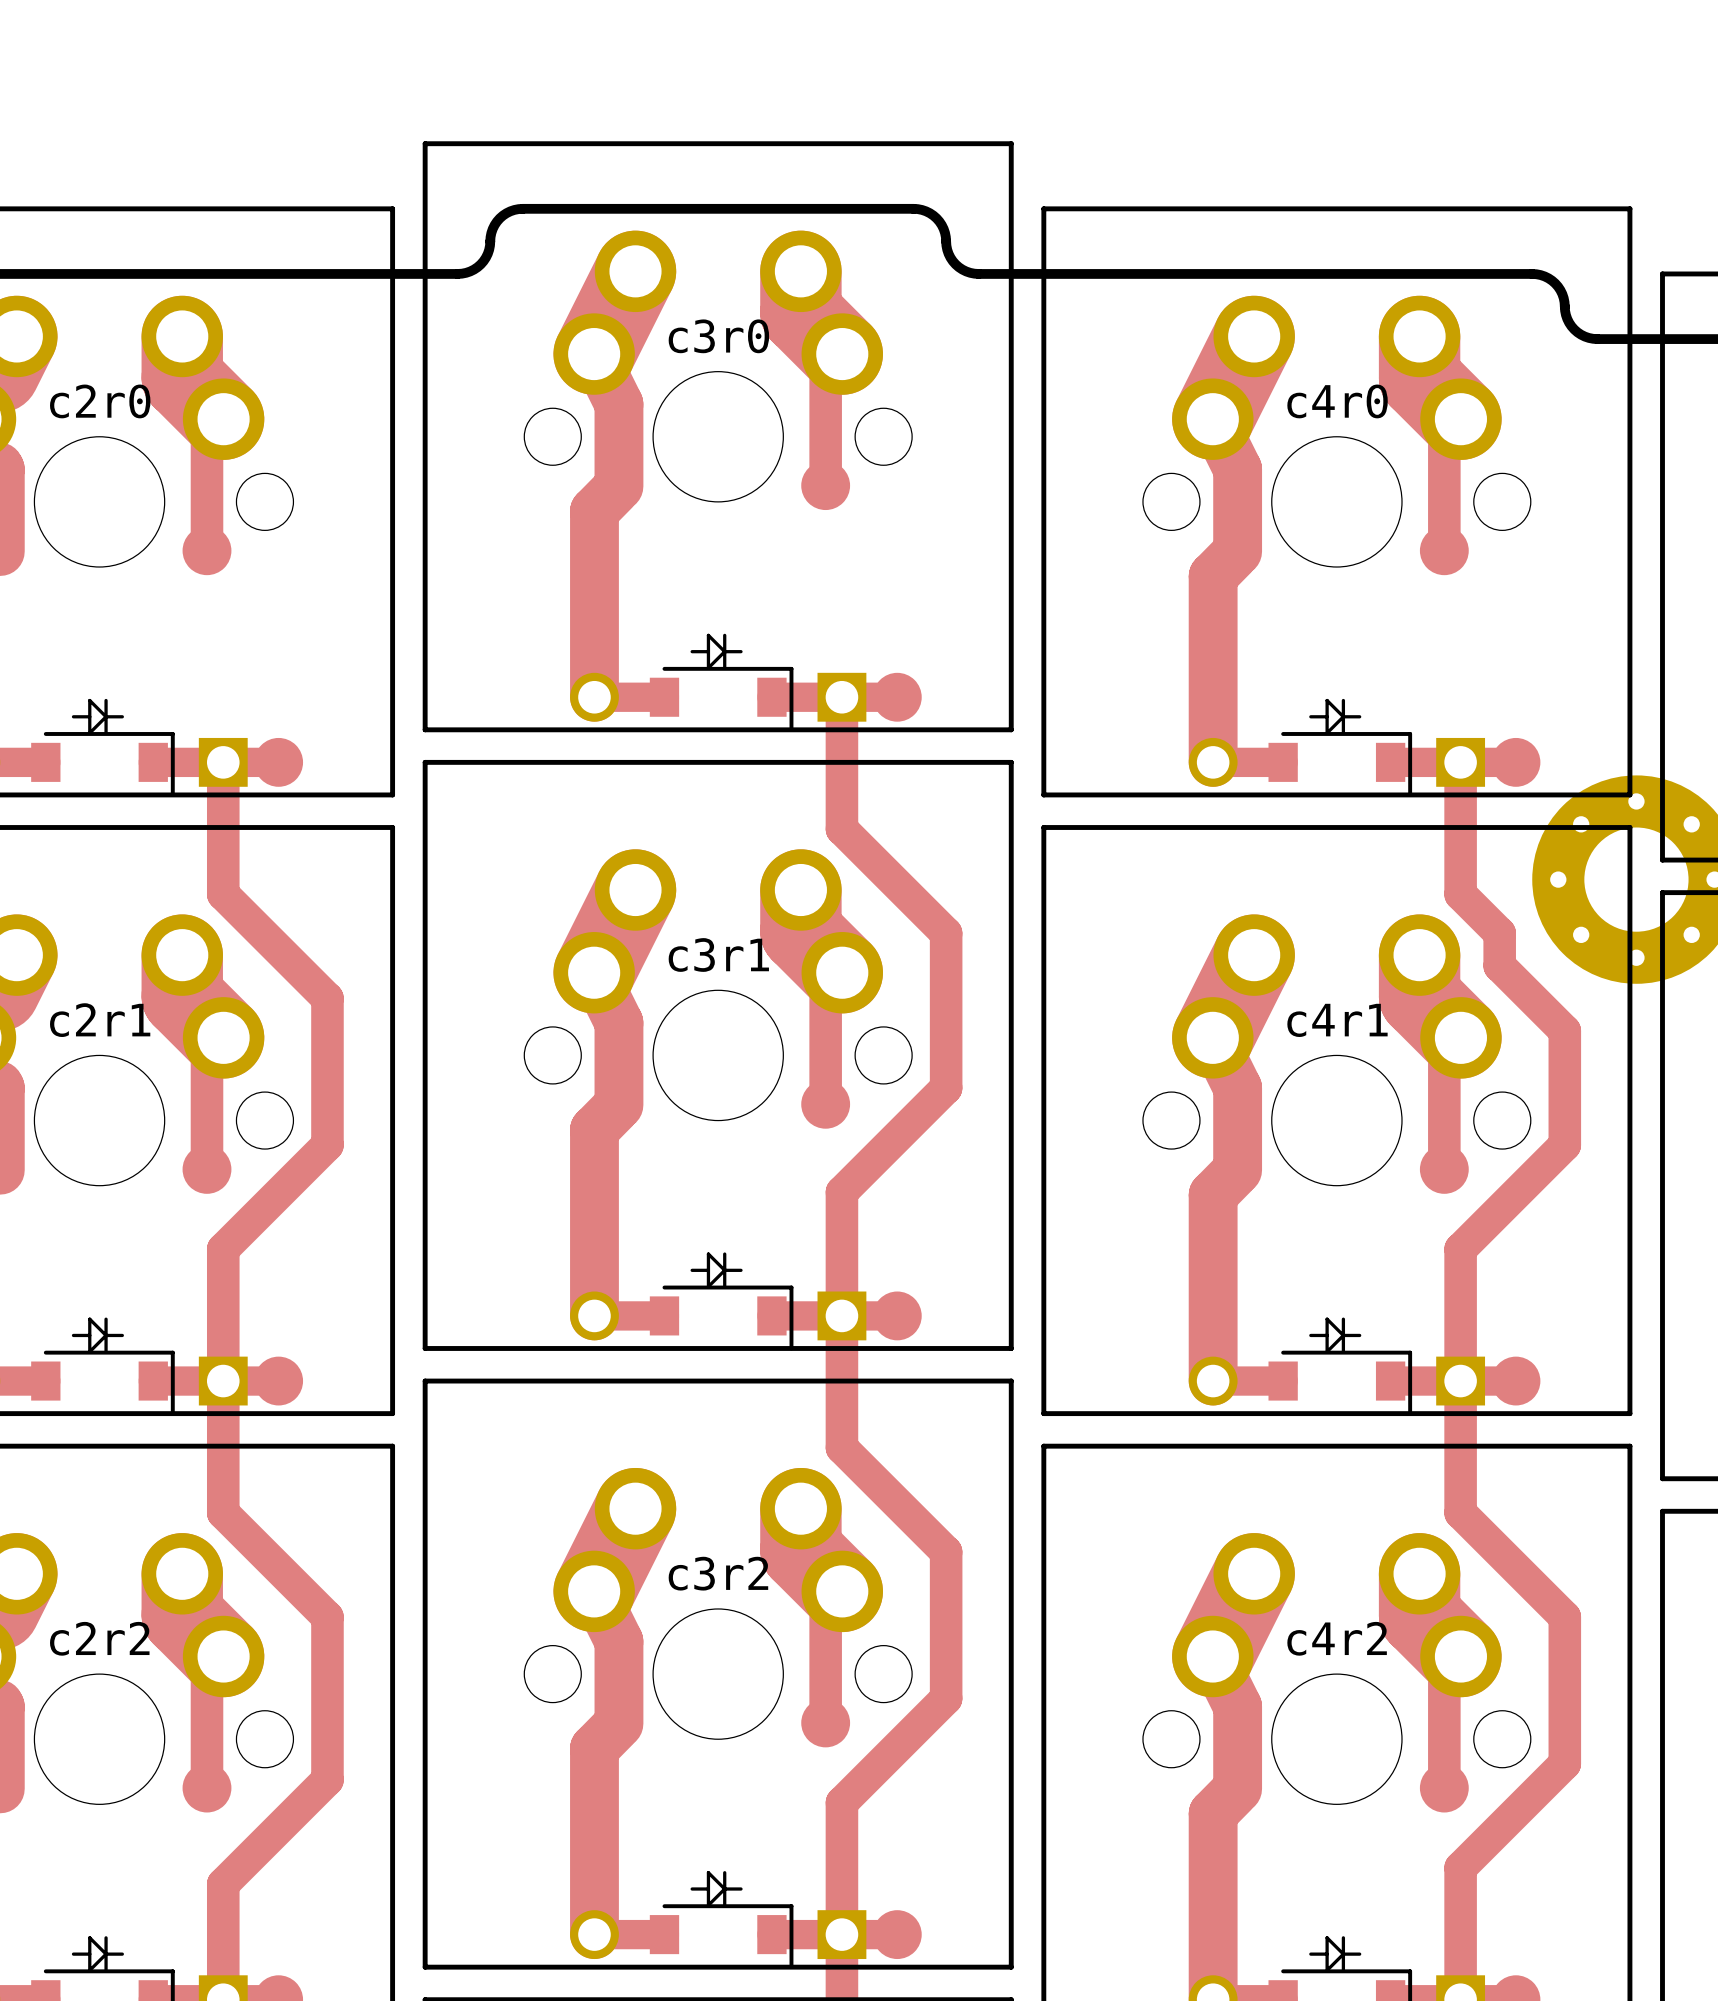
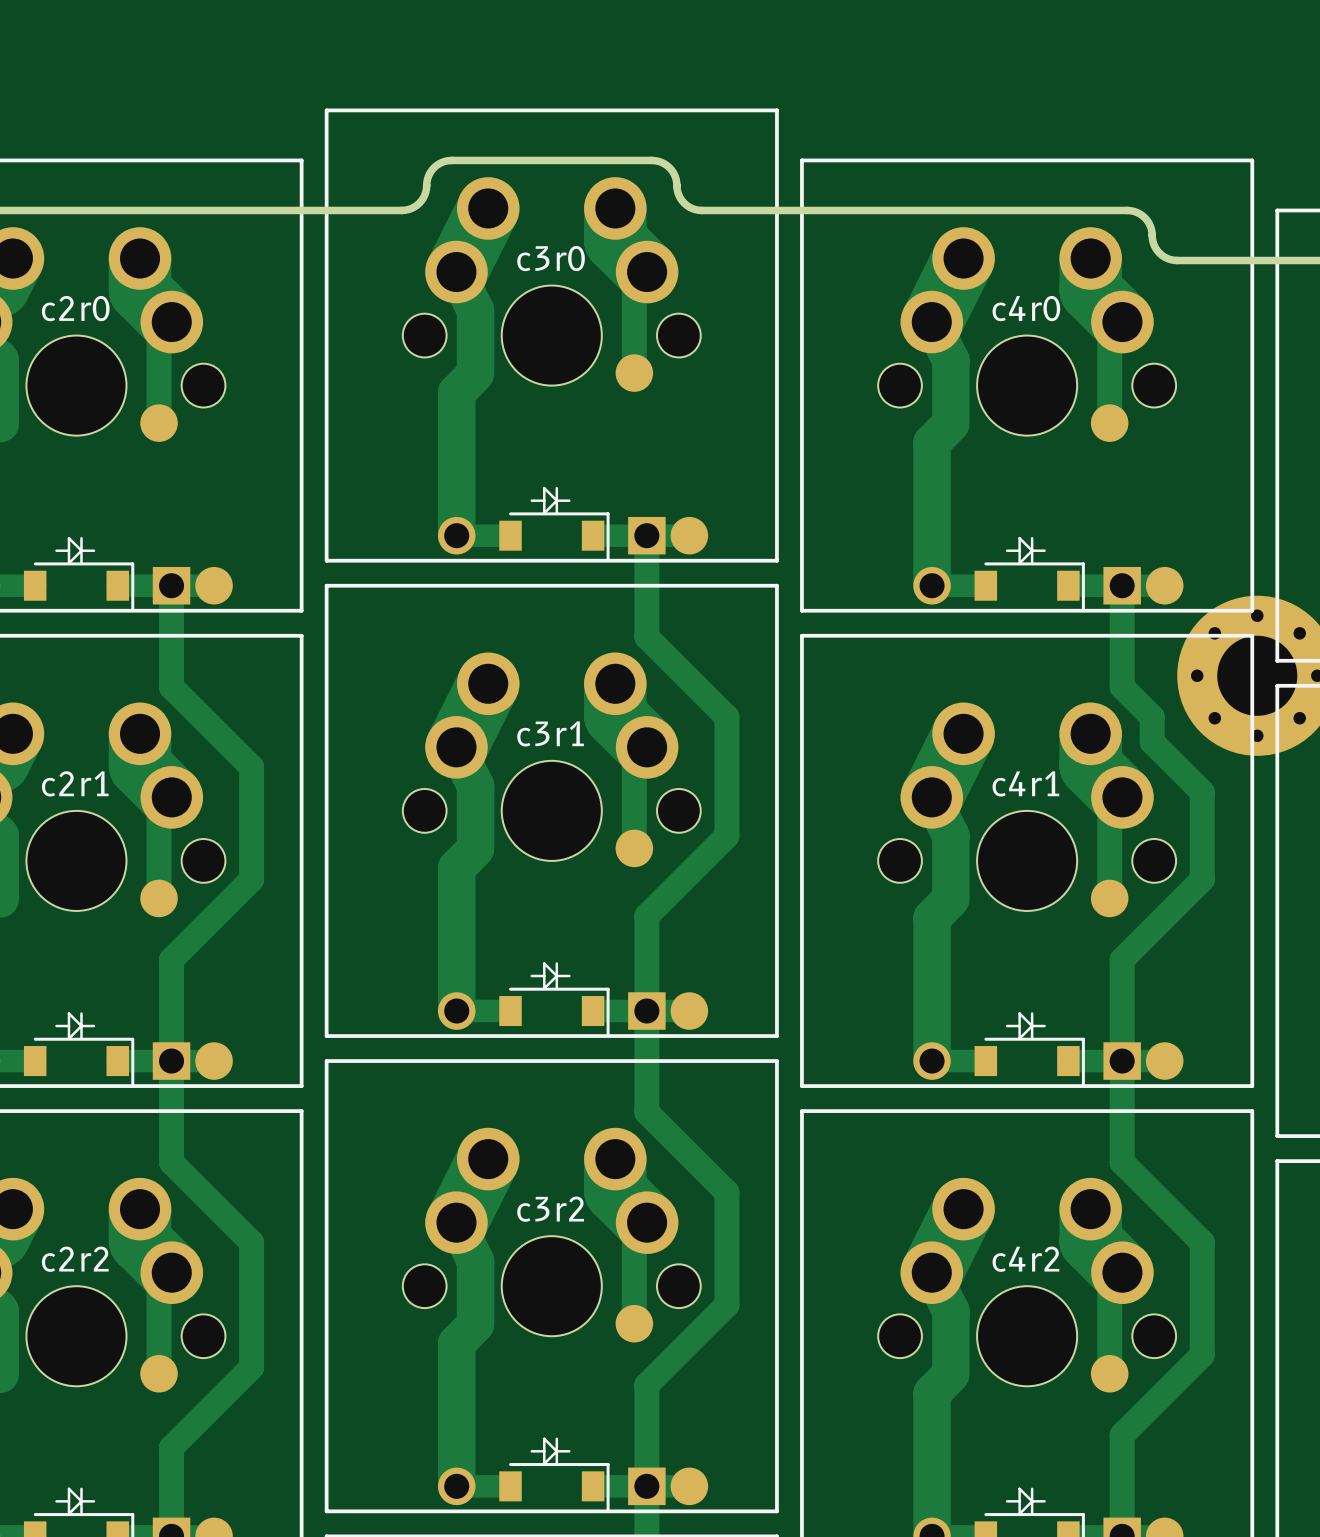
board edge: (587, 208) (522, 208) (506, 213) (497, 221) (492, 228) (489, 249) (483, 261) (470, 271) (457, 273) -> (451, 160) (442, 162) (431, 170) (427, 178) (424, 195) (414, 207) (401, 210) (351, 210)
board edge: (848, 208) (913, 208) (929, 213) (939, 221) (943, 228) (947, 249) (952, 261) (966, 271) (978, 273) -> (651, 160) (661, 162) (671, 170) (676, 178) (678, 195) (689, 207) (701, 210) (751, 210)
board edge: (1467, 273) (1532, 273) (1548, 278) (1558, 286) (1562, 294) (1565, 314) (1571, 326) (1584, 336) (1597, 339) -> (1127, 210) (1136, 212) (1147, 220) (1151, 229) (1154, 245) (1164, 257) (1177, 260) (1227, 260)

